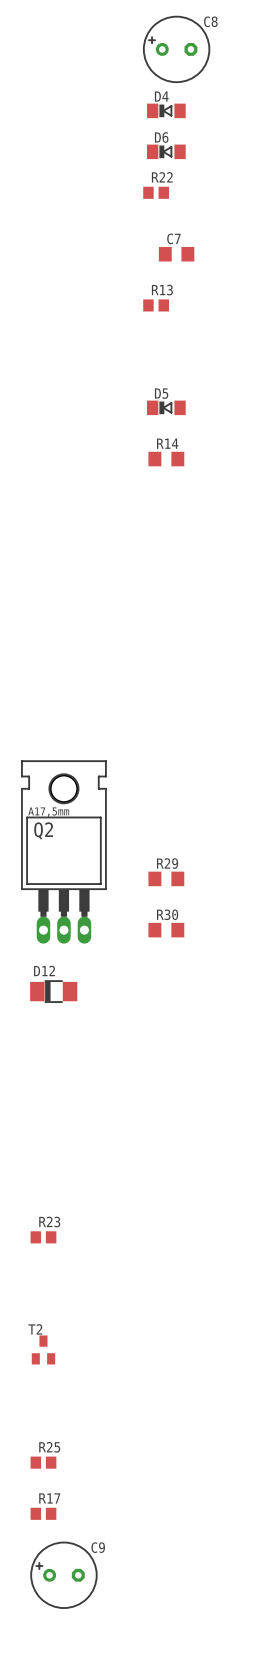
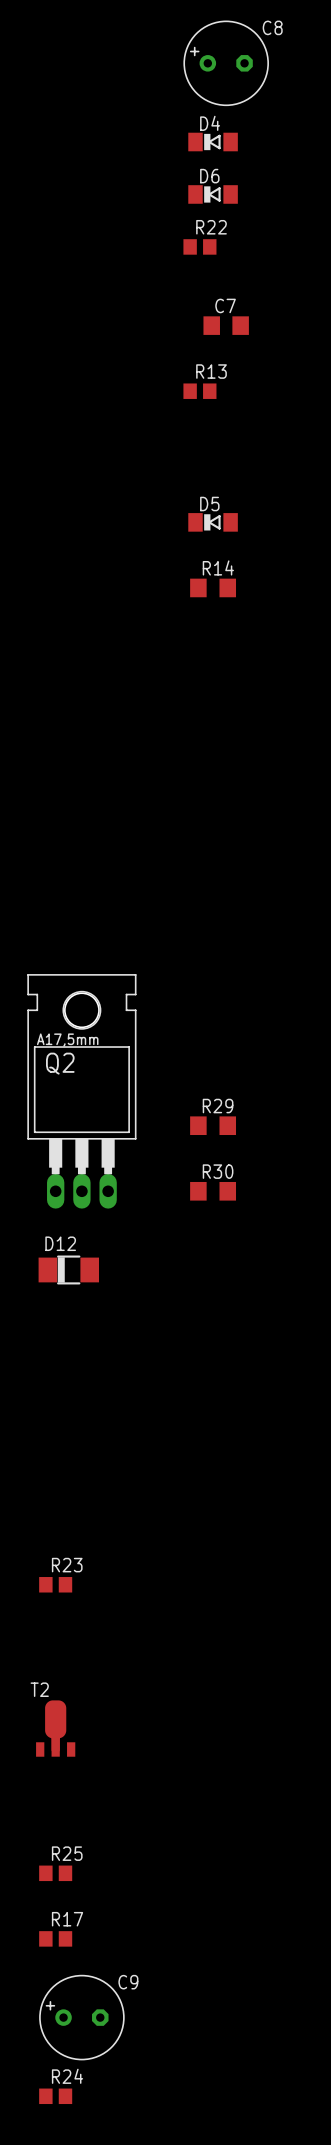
T2 footprint: [31, 1335, 56, 1365] -> [36, 1700, 76, 1757]
R24: none -> (55, 2096)

